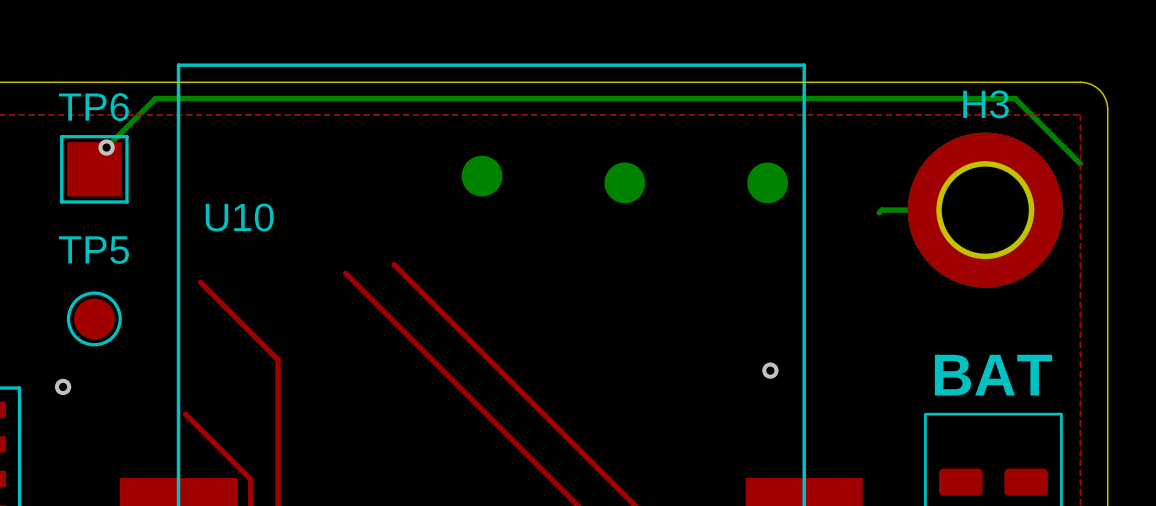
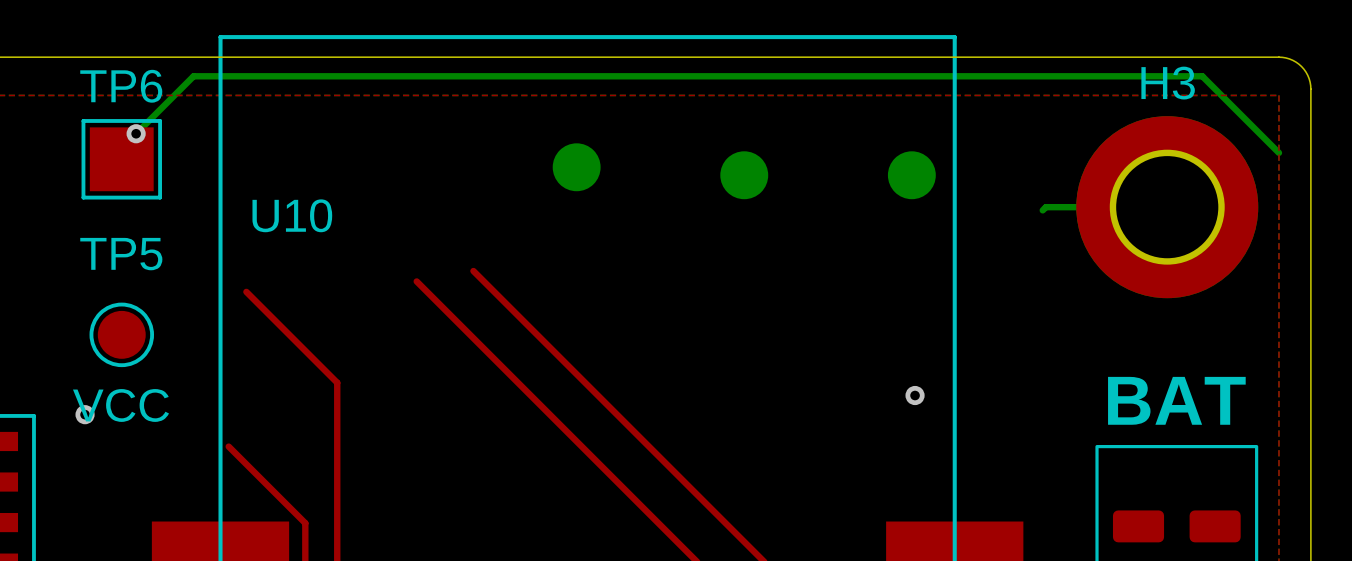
text: none -> VCC (120, 405)

